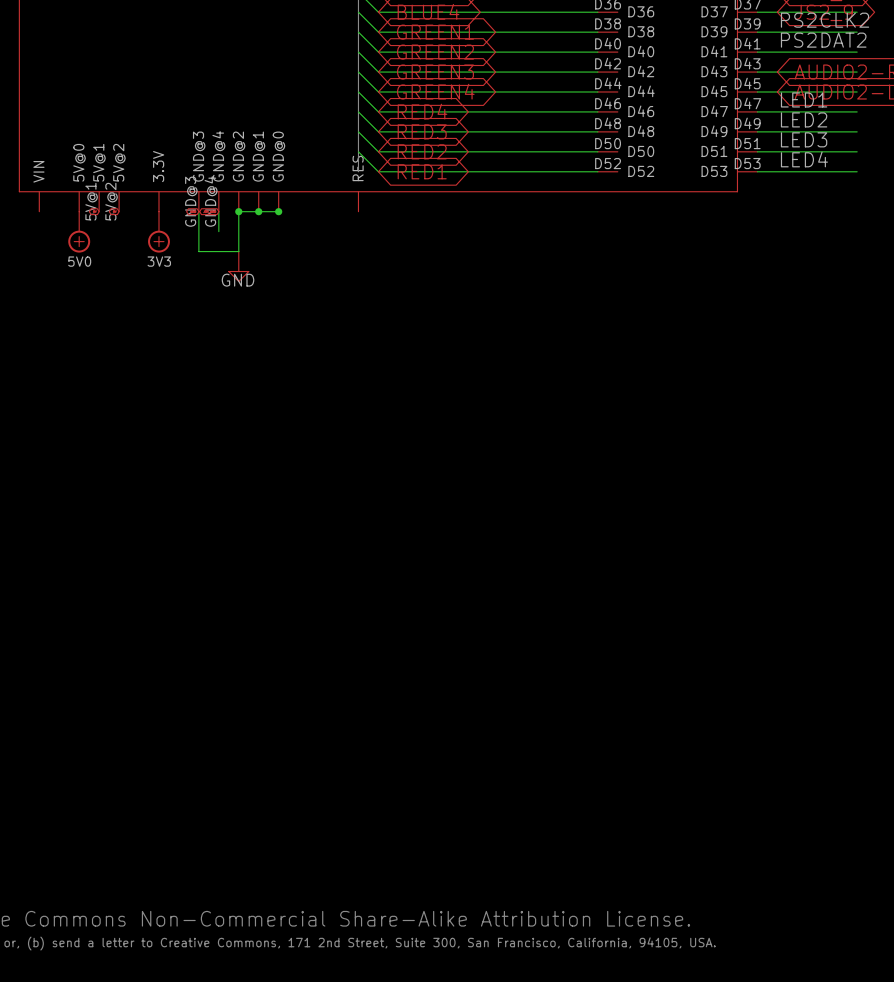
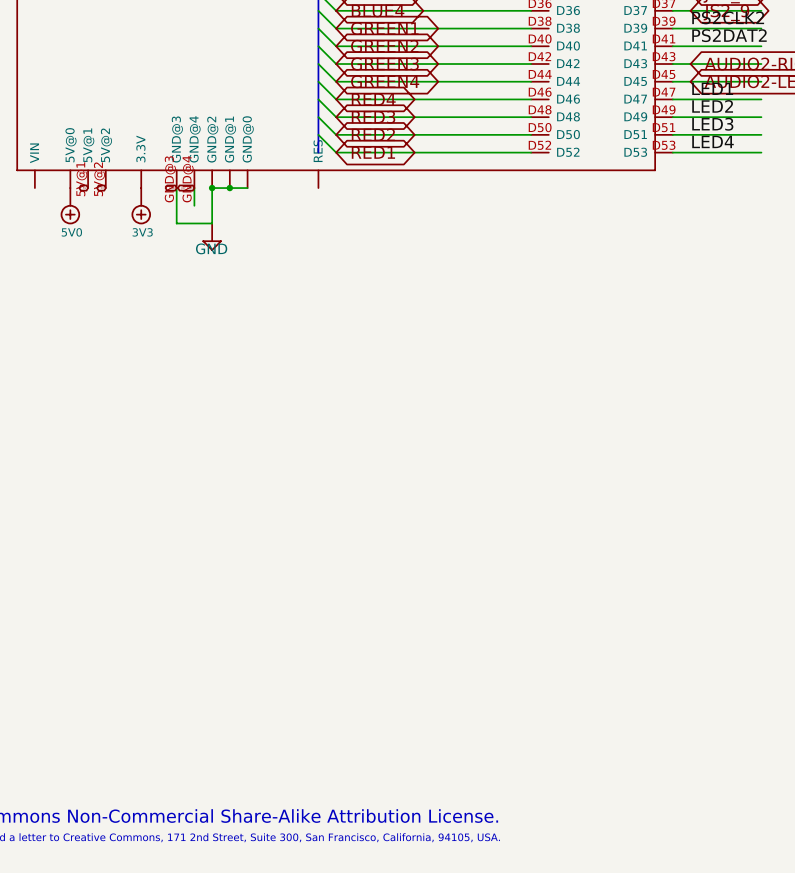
junction: (278, 211) -> none

